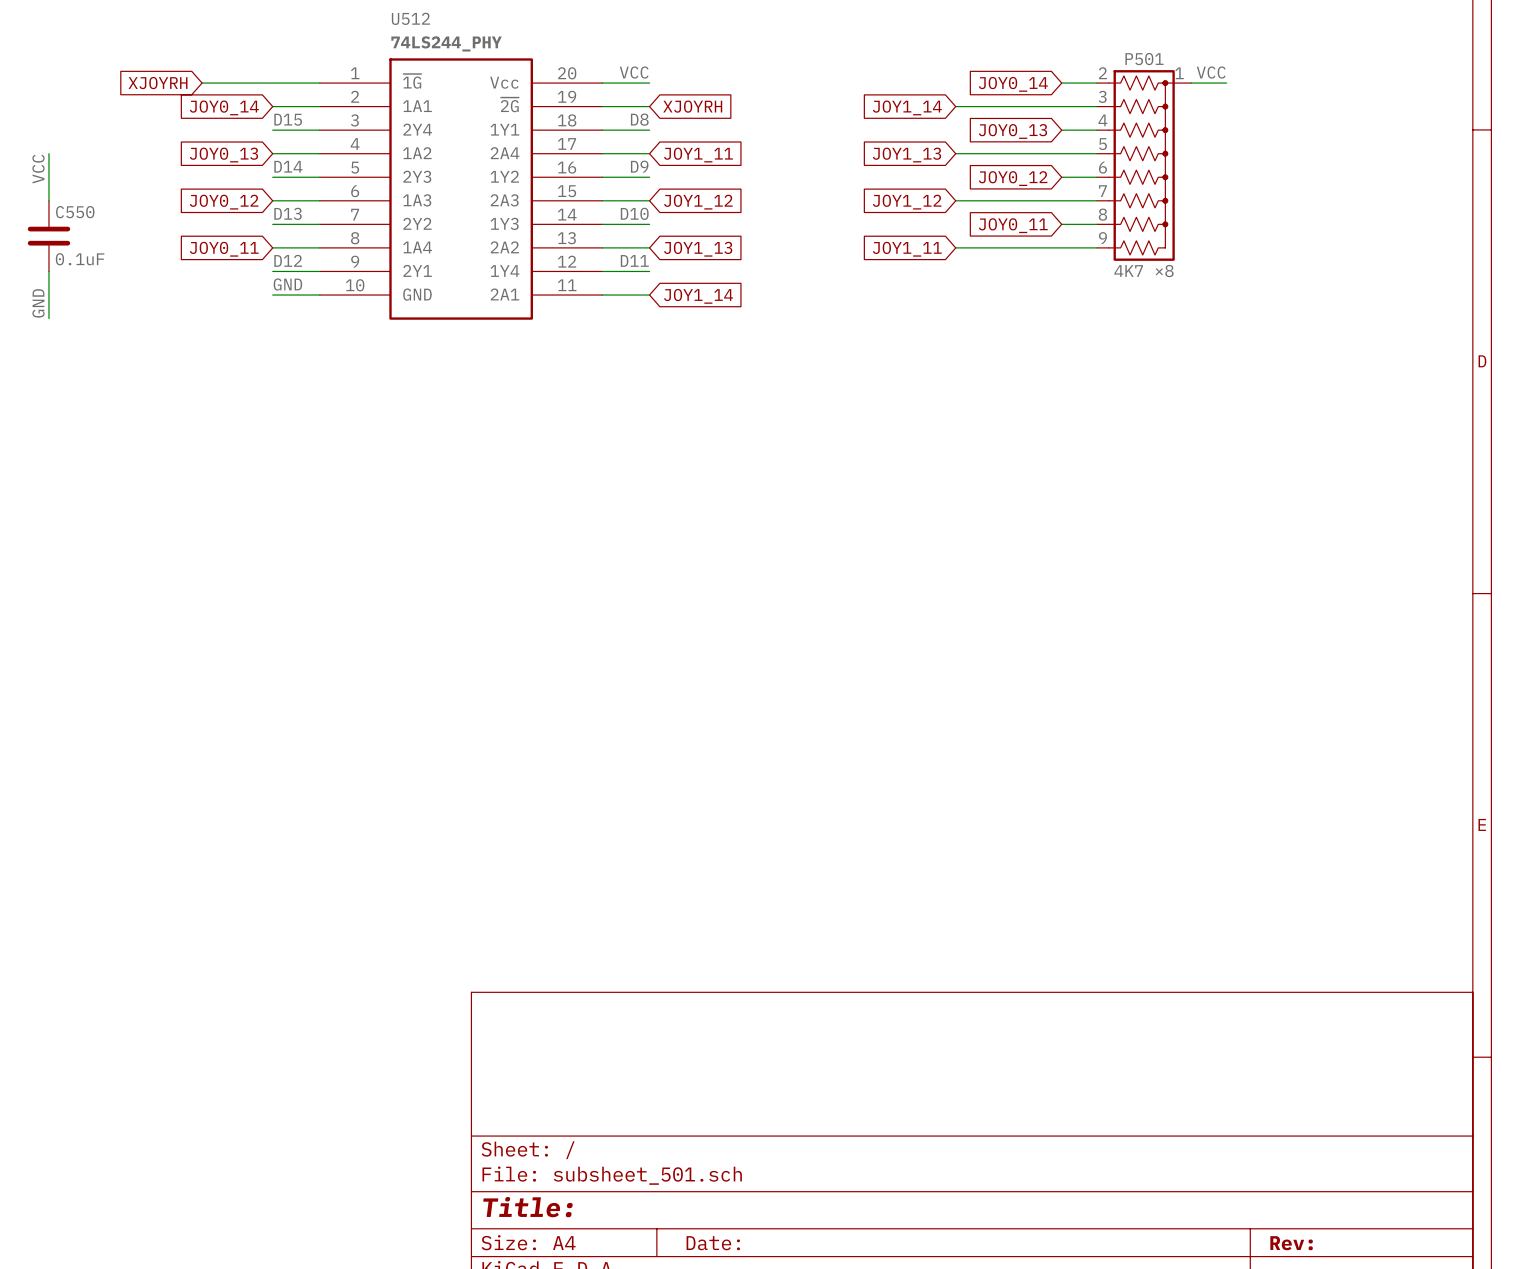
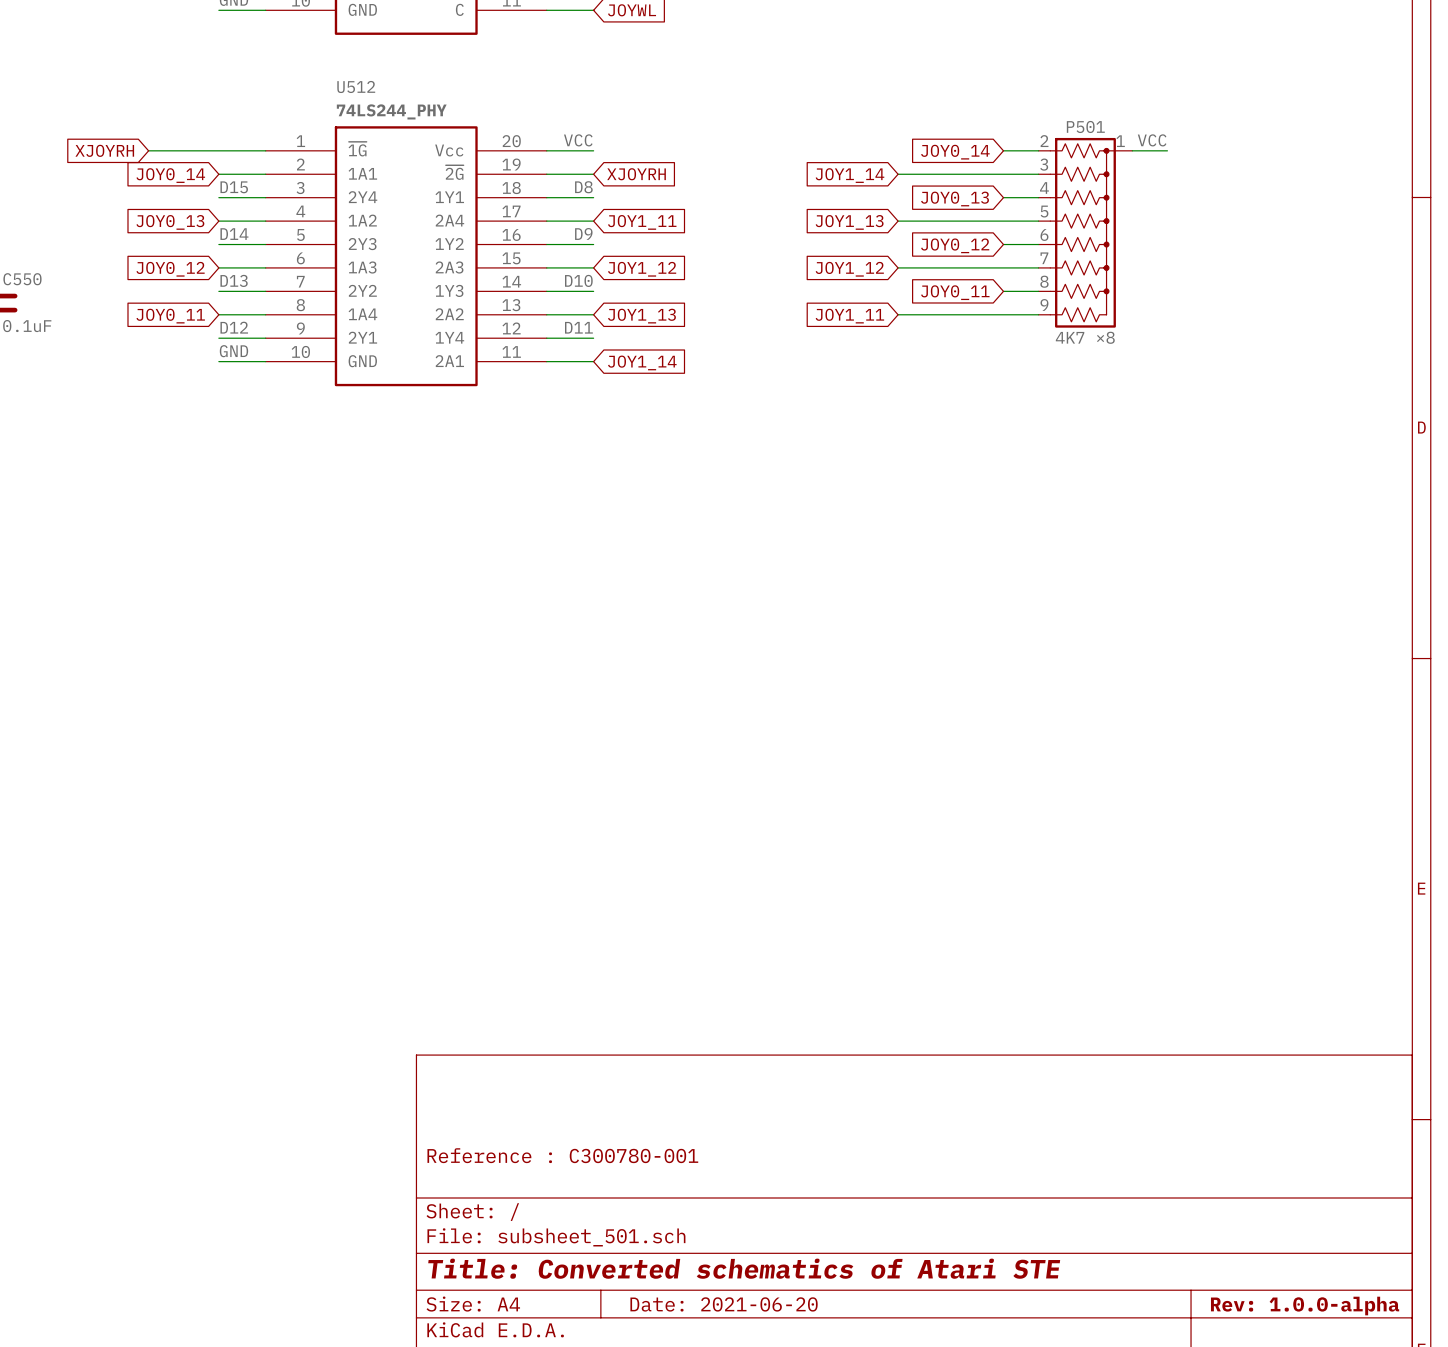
title block: none -> Reference : C300780-001 (562, 1155)
title block: Title: (527, 1207) -> Title: Converted schematics of Atari STE (744, 1268)
title block: Date: (713, 1243) -> Date: 2021-06-20 (724, 1304)
title block: Rev: (1291, 1243) -> Rev: 1.0.0-alpha (1305, 1306)

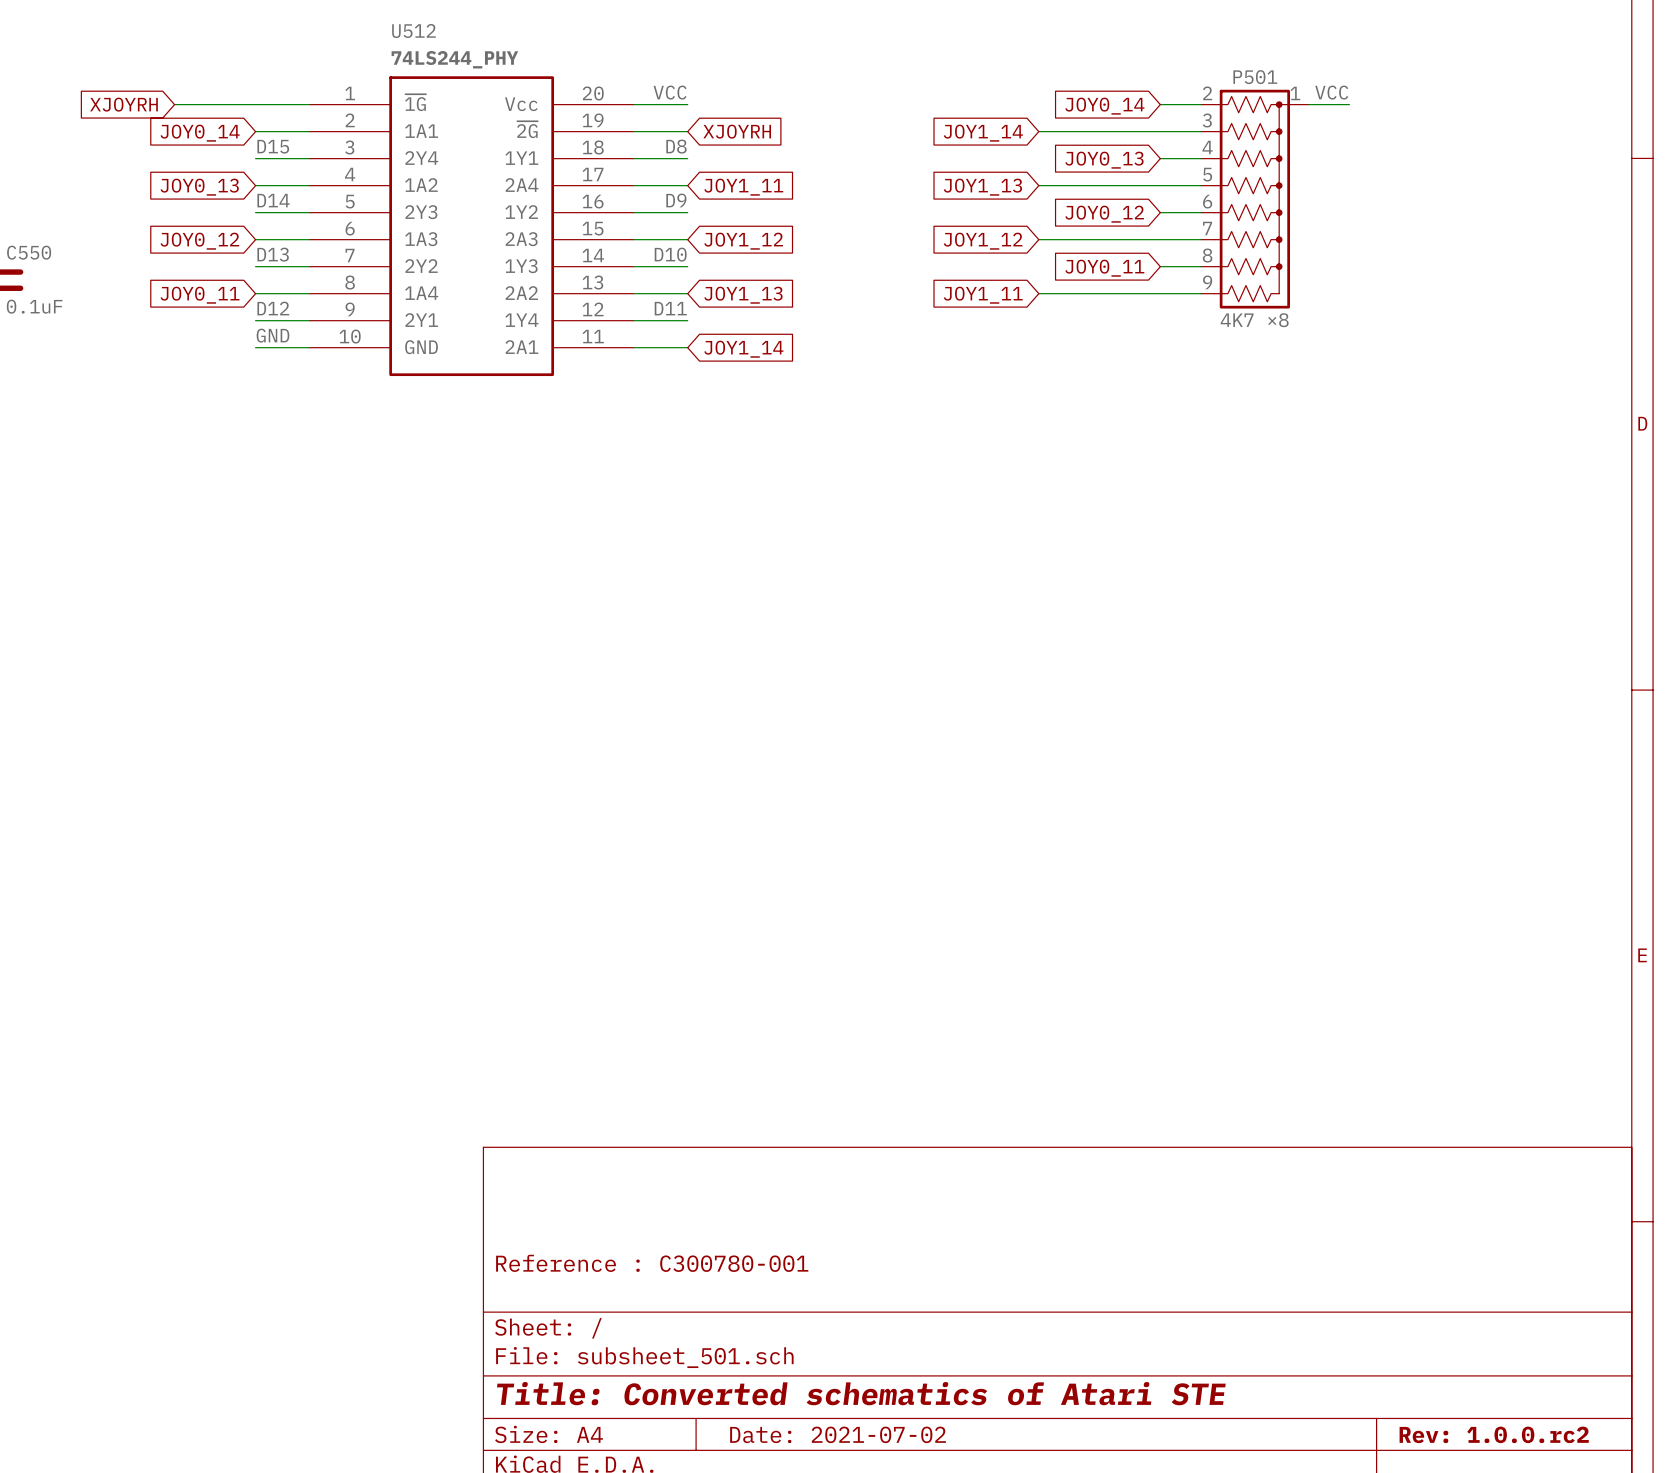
title block: Date: 2021-06-20 (724, 1304) -> Date: 2021-07-02 (838, 1434)
title block: Rev: 1.0.0-alpha (1305, 1306) -> Rev: 1.0.0.rc2 (1494, 1434)

